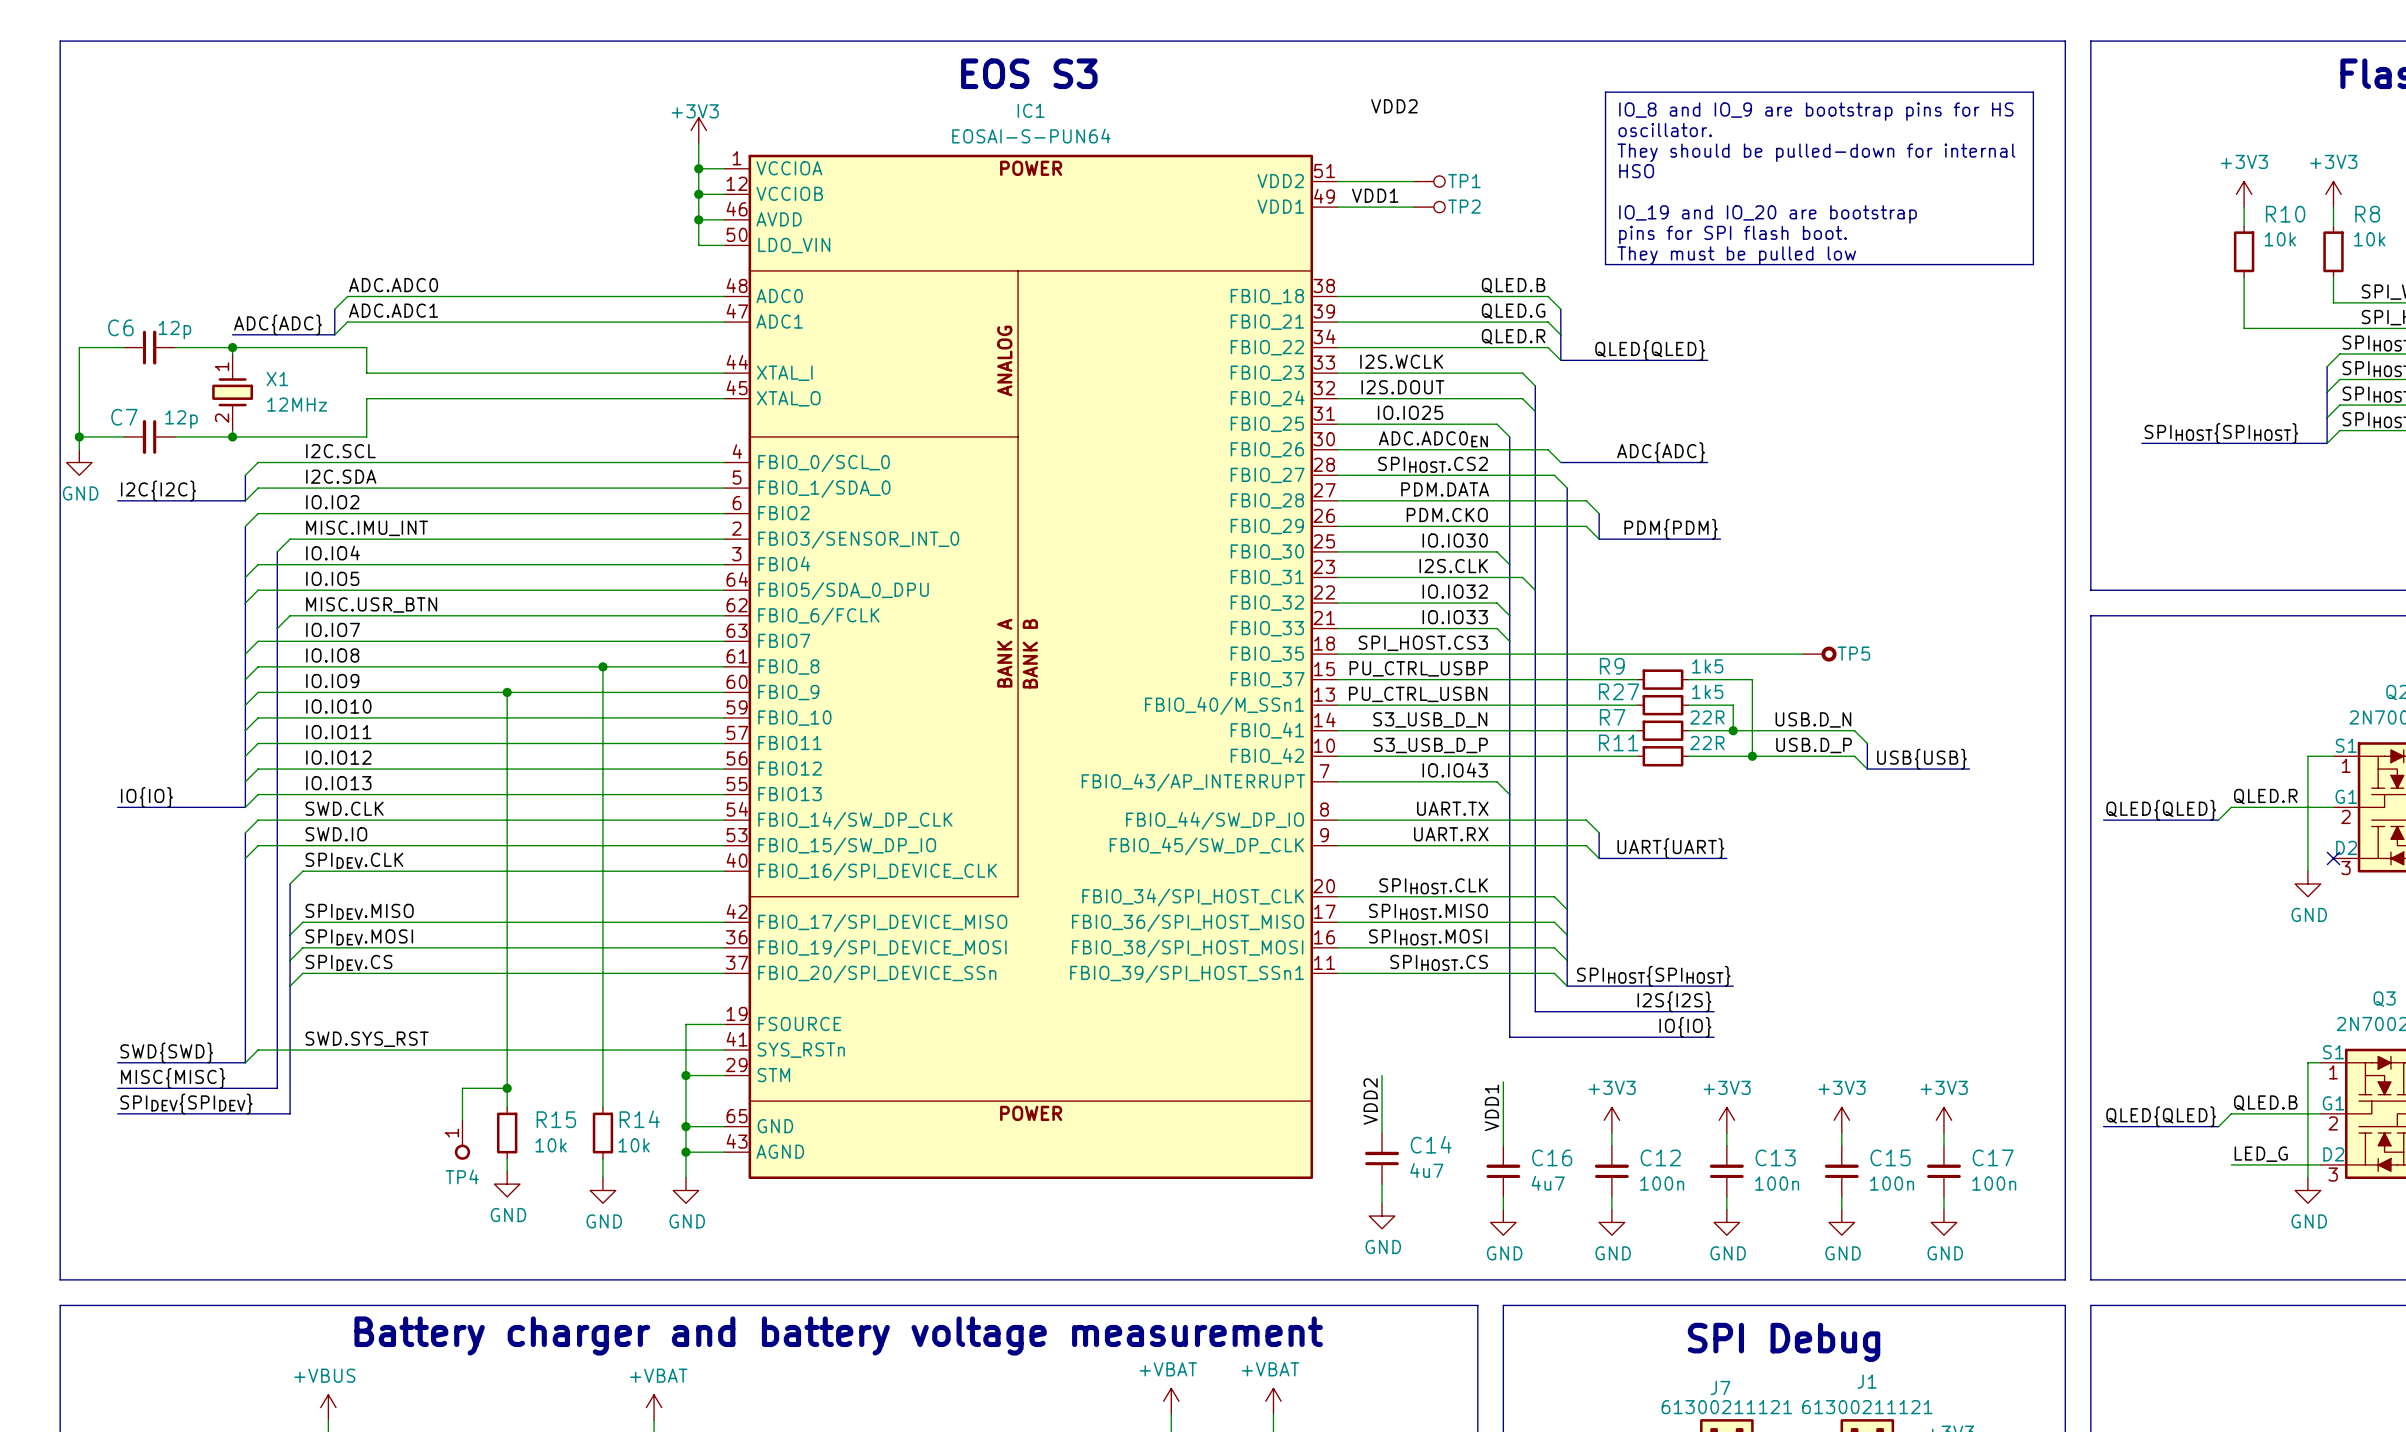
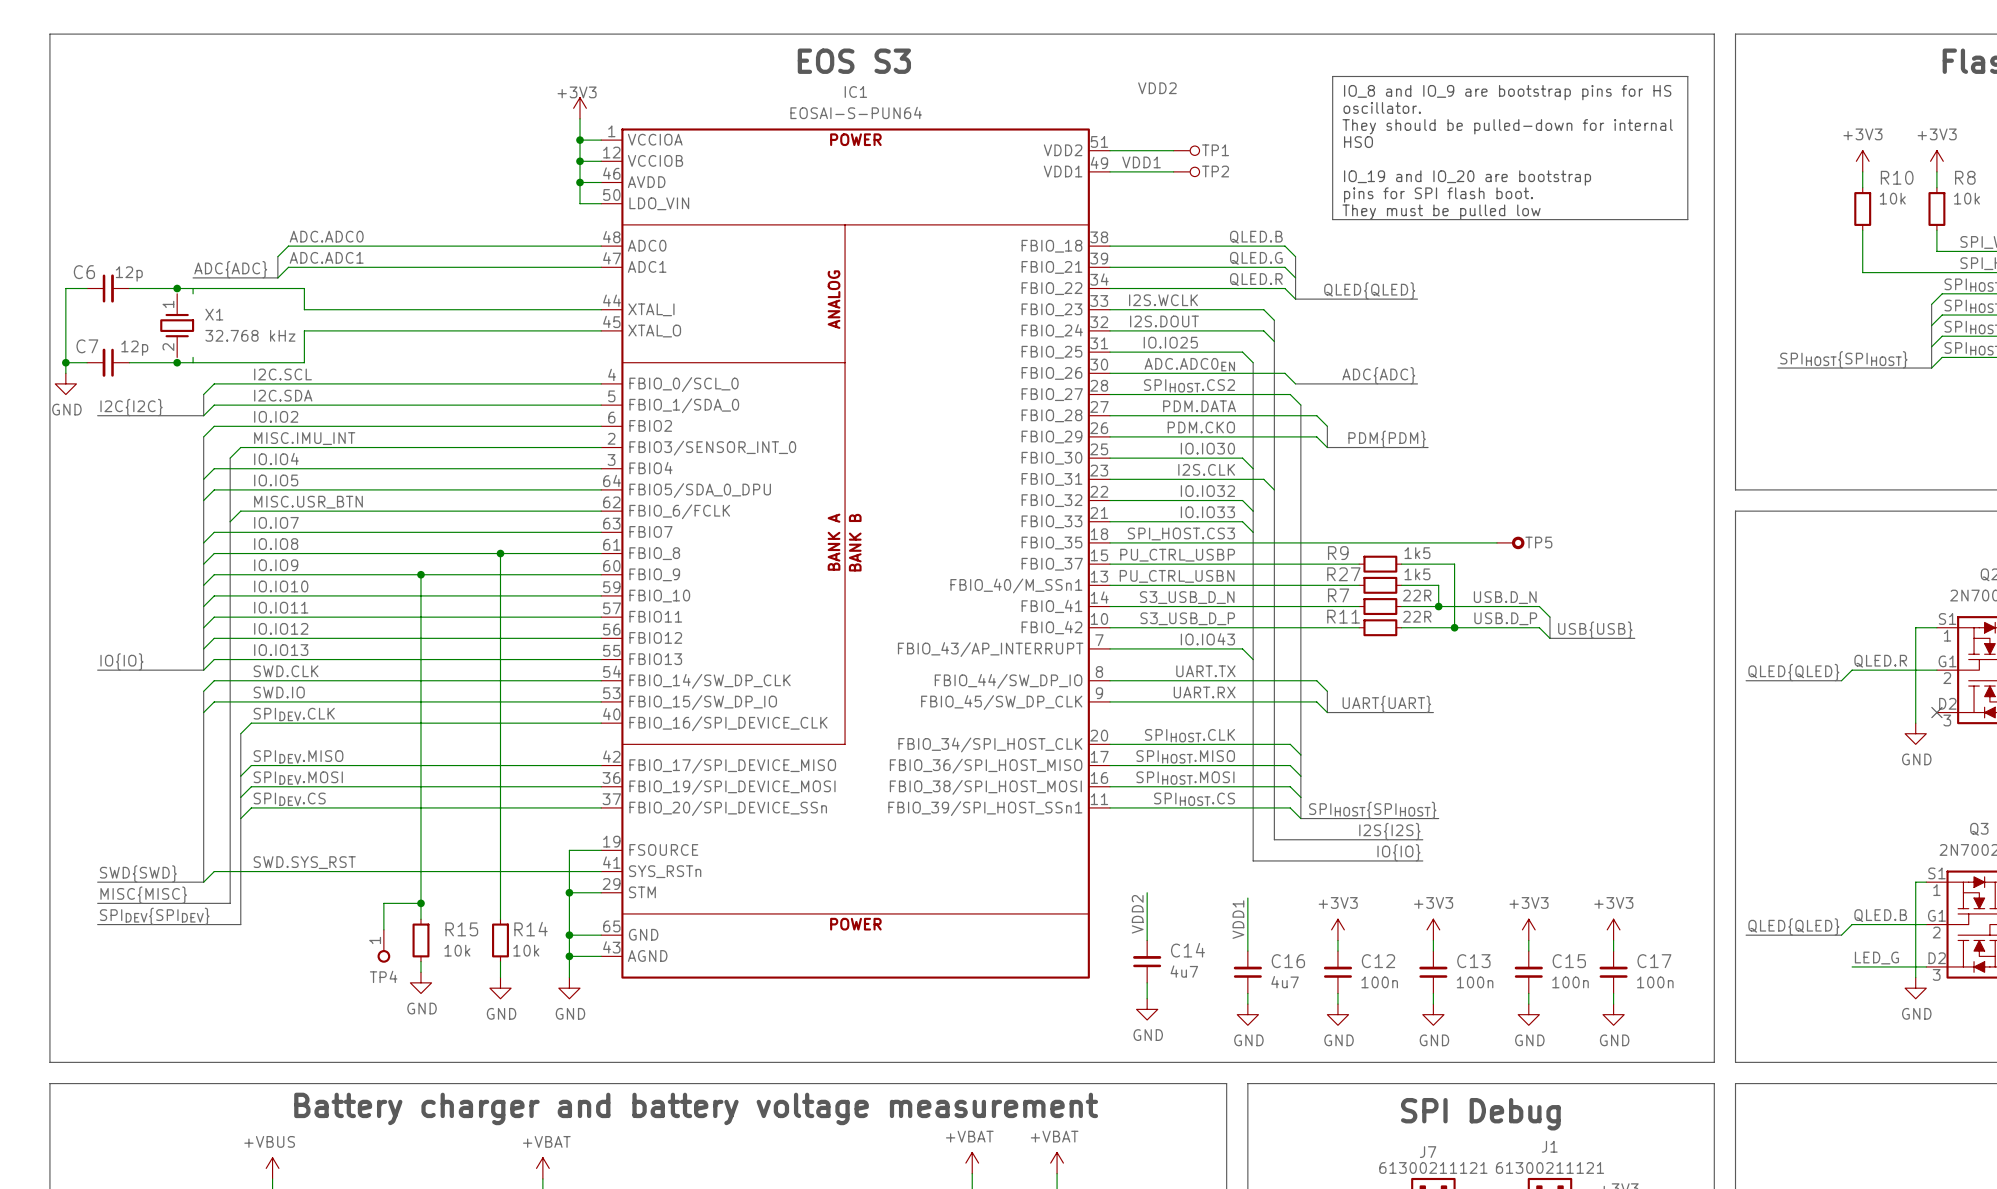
C6 position: (149, 347) -> (108, 288)
junction position: (232, 347) -> (177, 288)
X1 position: (232, 392) -> (177, 325)
X1 text: 12MHz (297, 404) -> 32.768 kHz (250, 335)
C7 position: (149, 436) -> (108, 362)
junction position: (232, 436) -> (177, 362)

